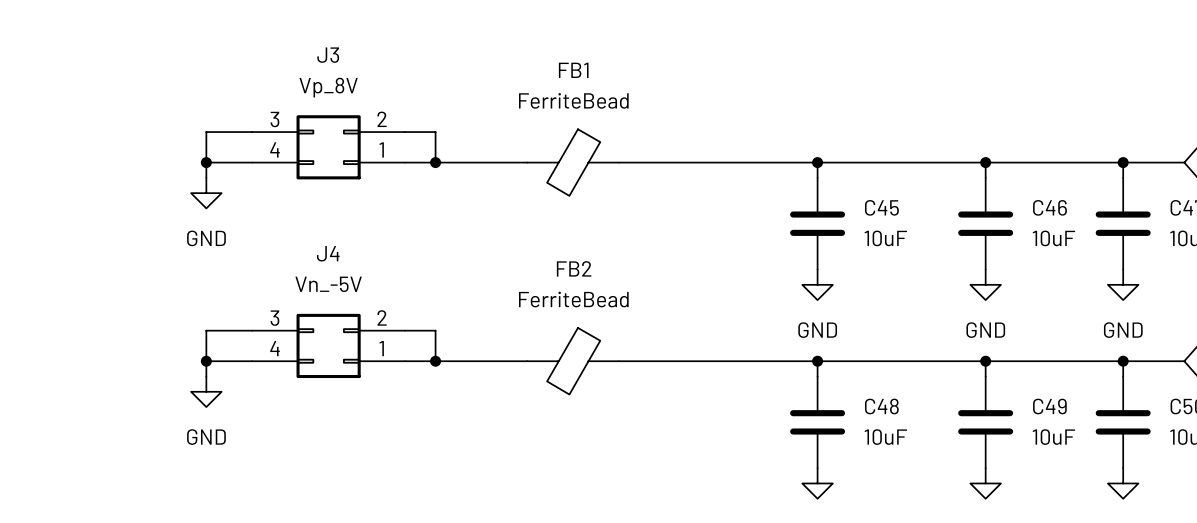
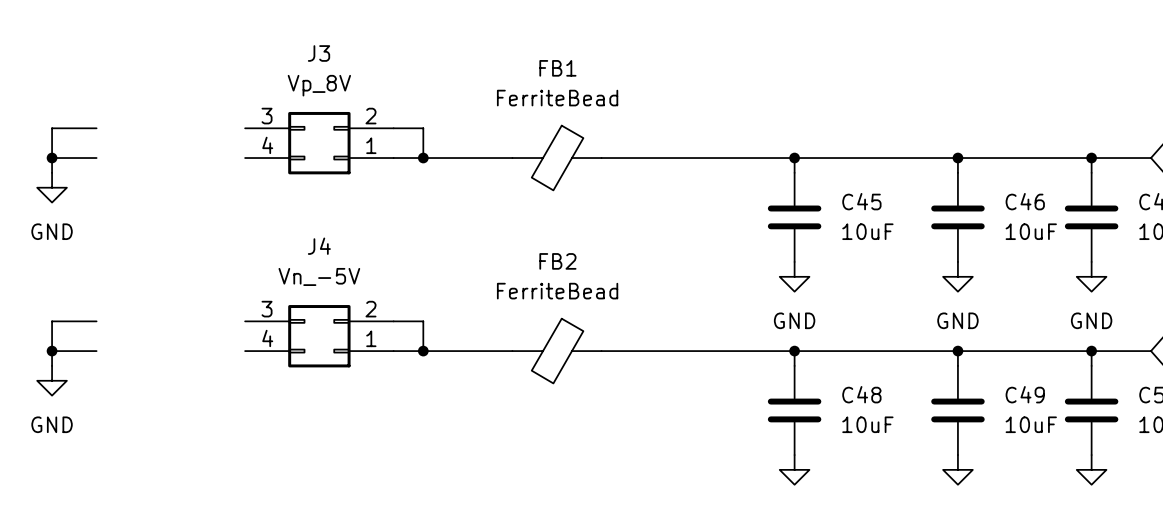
wire: (252, 132) (206, 132) (206, 177) -> (96, 128) (52, 128) (52, 172)
junction: none -> (52, 158)
wire: (206, 162) (252, 162) -> (52, 158) (96, 158)
junction: (206, 162) -> none
power symbol: none -> GND (52, 187)
power symbol: GND (206, 193) -> none
wire: (252, 330) (206, 330) (206, 376) -> (96, 321) (52, 321) (52, 365)
junction: none -> (52, 351)
wire: (206, 361) (252, 361) -> (52, 351) (96, 351)
junction: (206, 361) -> none
power symbol: none -> GND (52, 380)
power symbol: GND (206, 391) -> none

